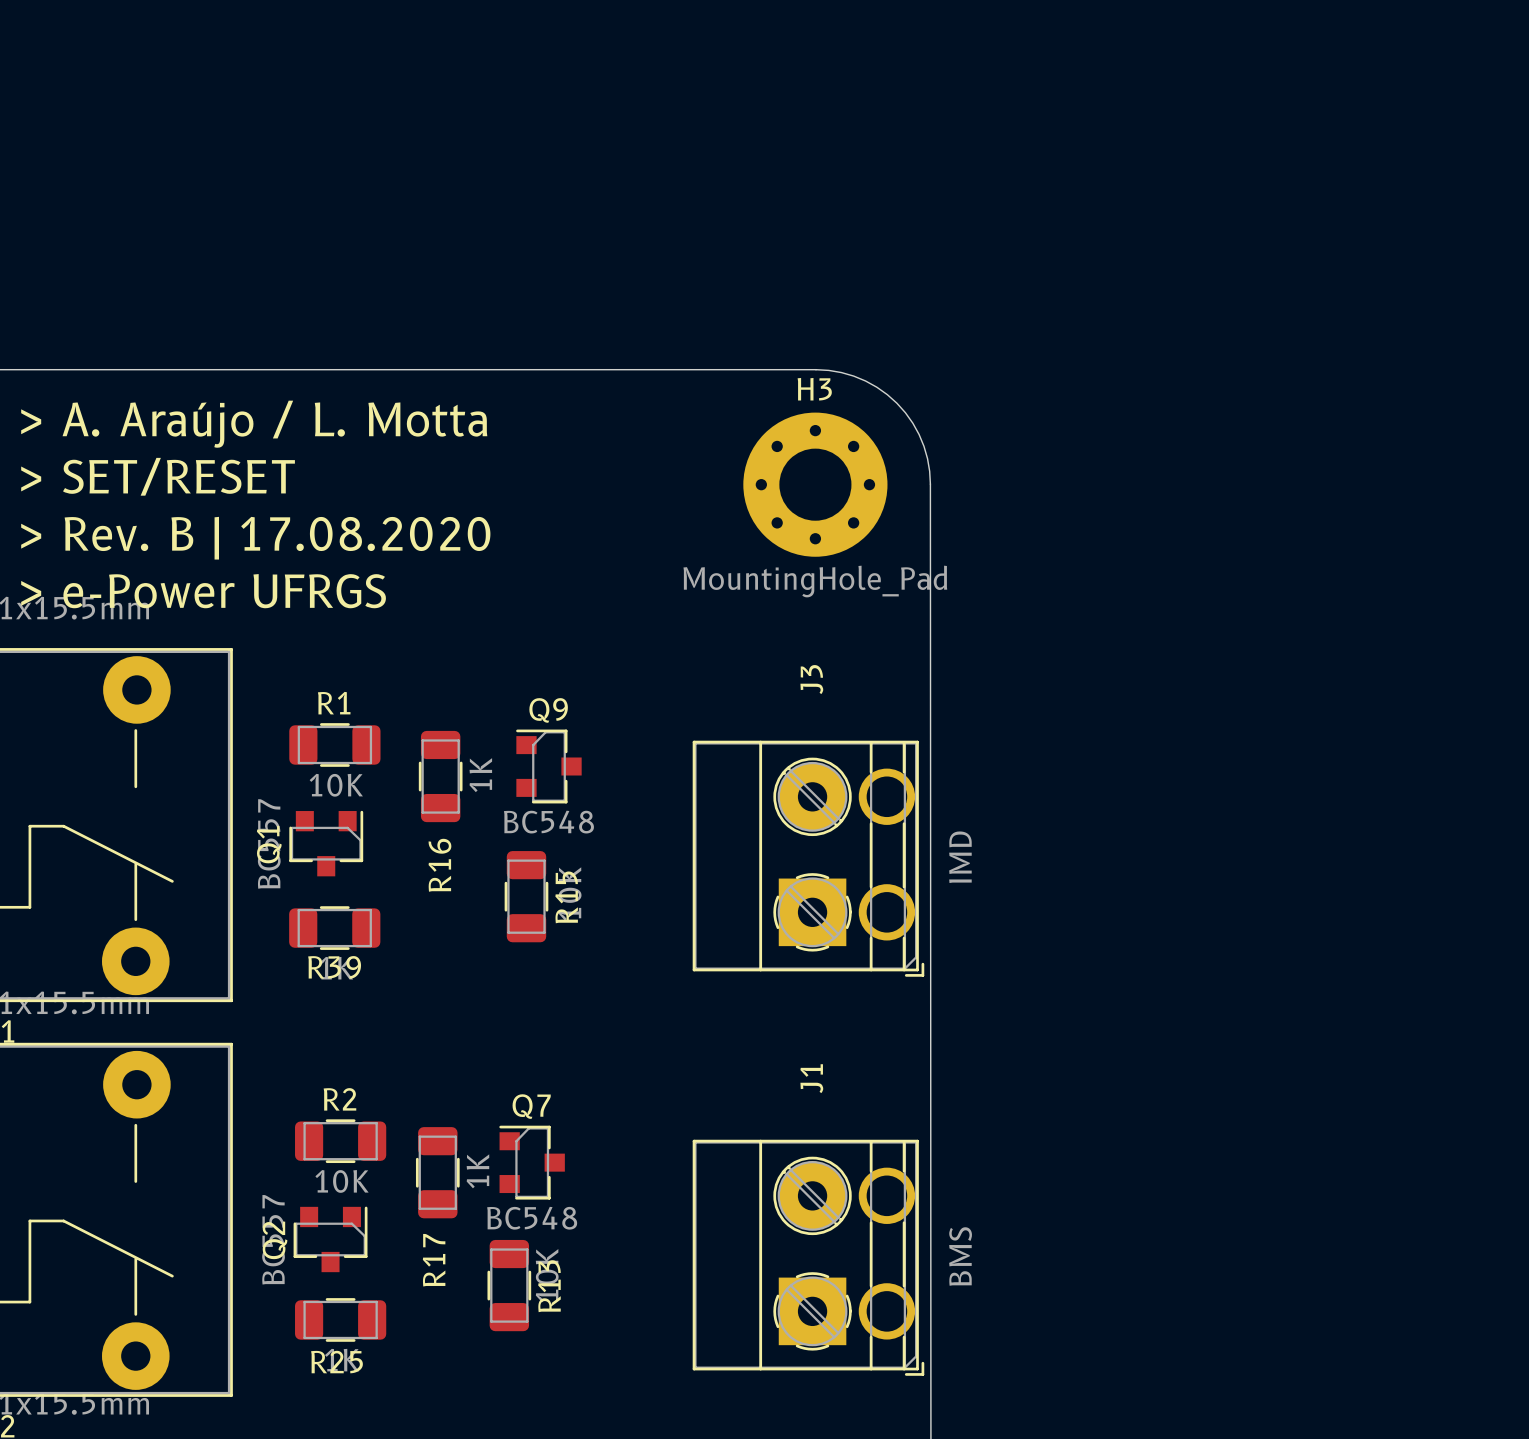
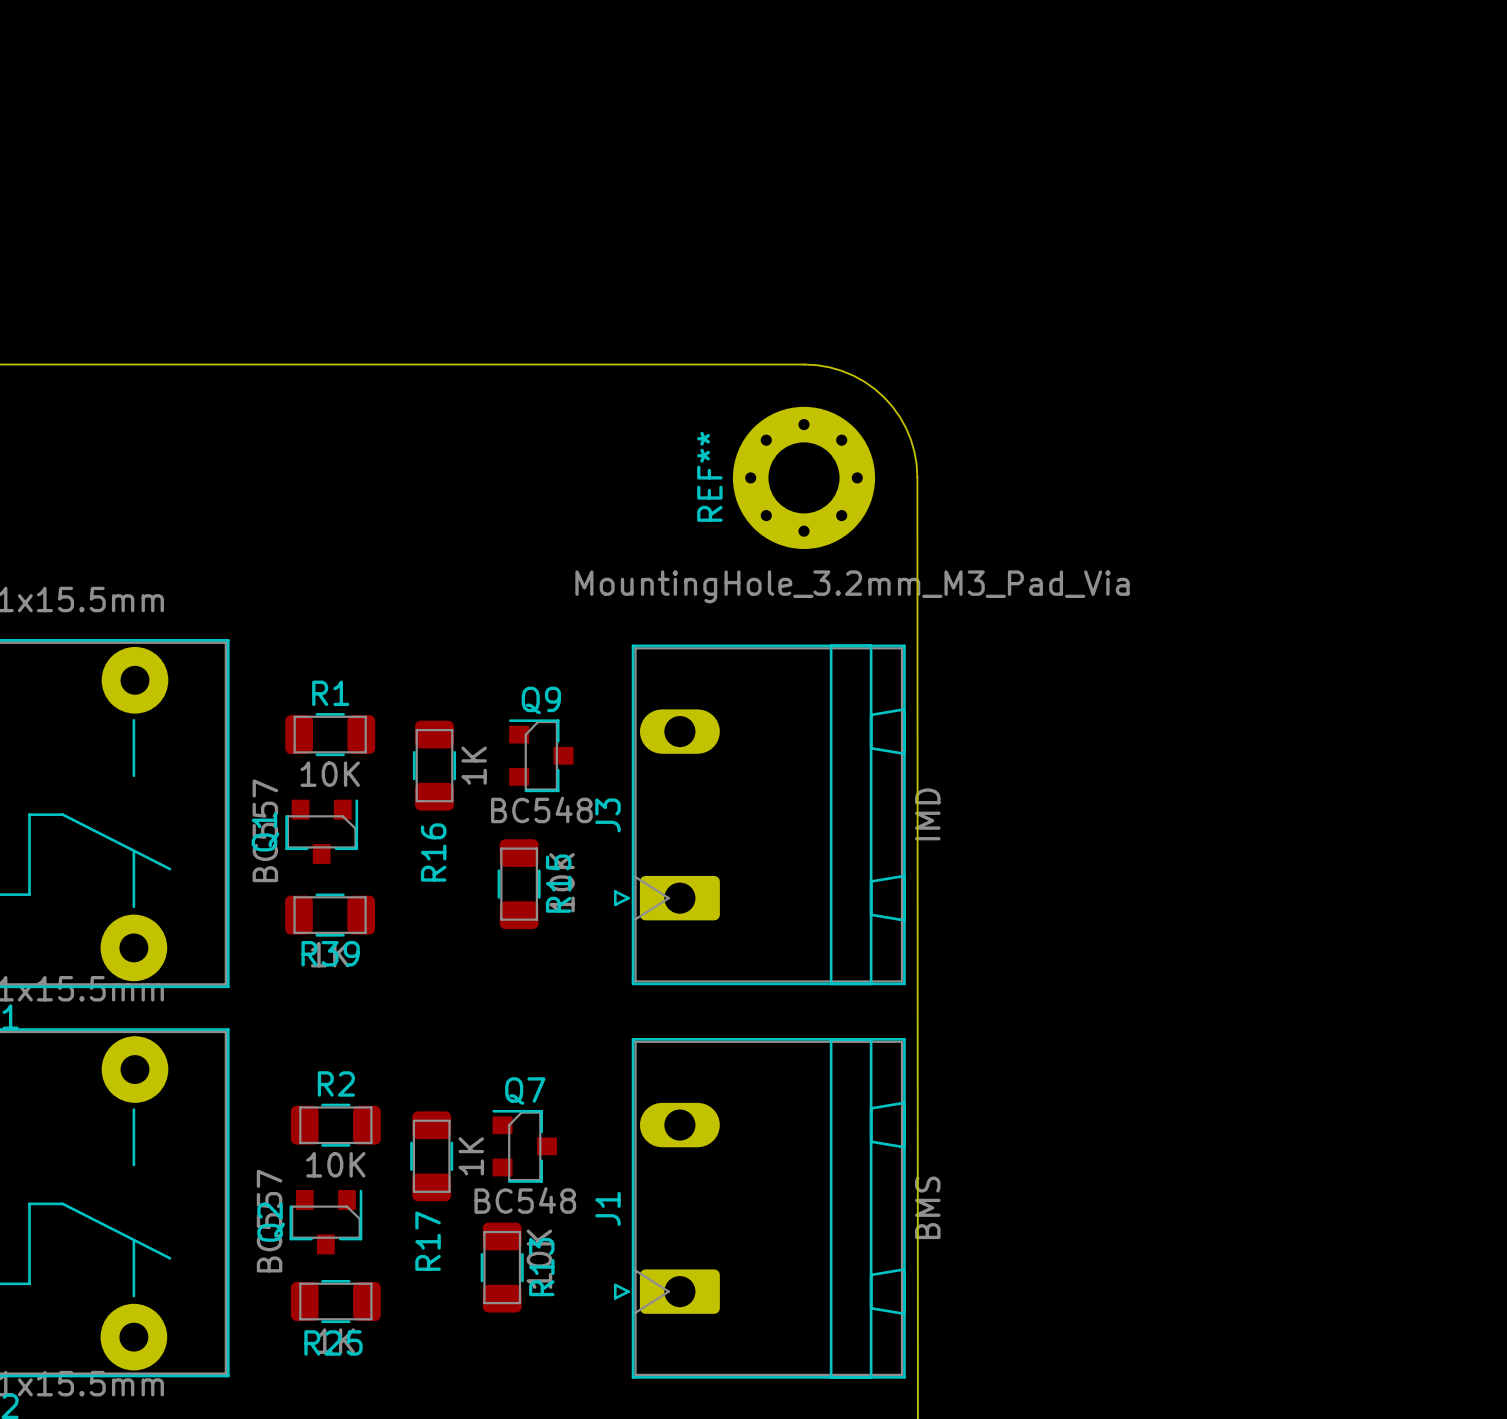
H3 name: H3 (814, 389) -> REF** (709, 476)
text: > A. Araújo / L. Motta (254, 424) -> none
text: > SET/RESET (158, 476) -> none
text: > Rev. B | 17.08.2020 (255, 538) -> none
H3 value: MountingHole_Pad (815, 581) -> MountingHole_3.2mm_M3_Pad_Via (852, 586)
text: > e-Power UFRGS (203, 591) -> none
J3 name position: J3 (811, 679) -> J3 (607, 815)
J3 footprint: [692, 740, 925, 977] -> [613, 644, 906, 986]
J1 name position: J1 (811, 1078) -> J1 (607, 1208)
J1 footprint: [692, 1139, 925, 1376] -> [613, 1038, 906, 1379]

